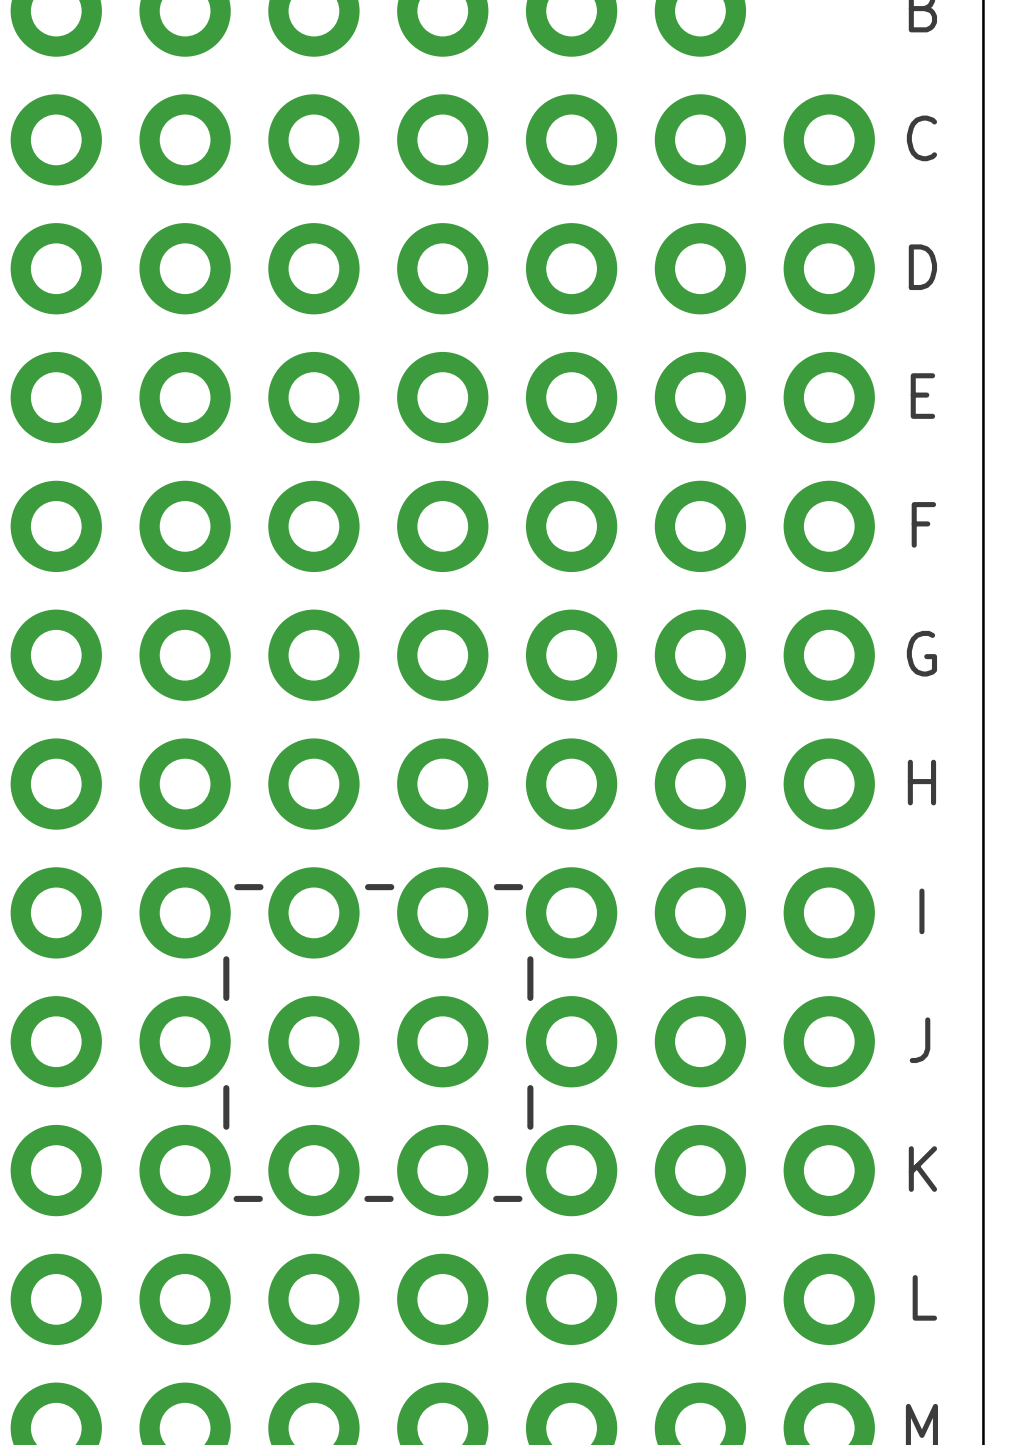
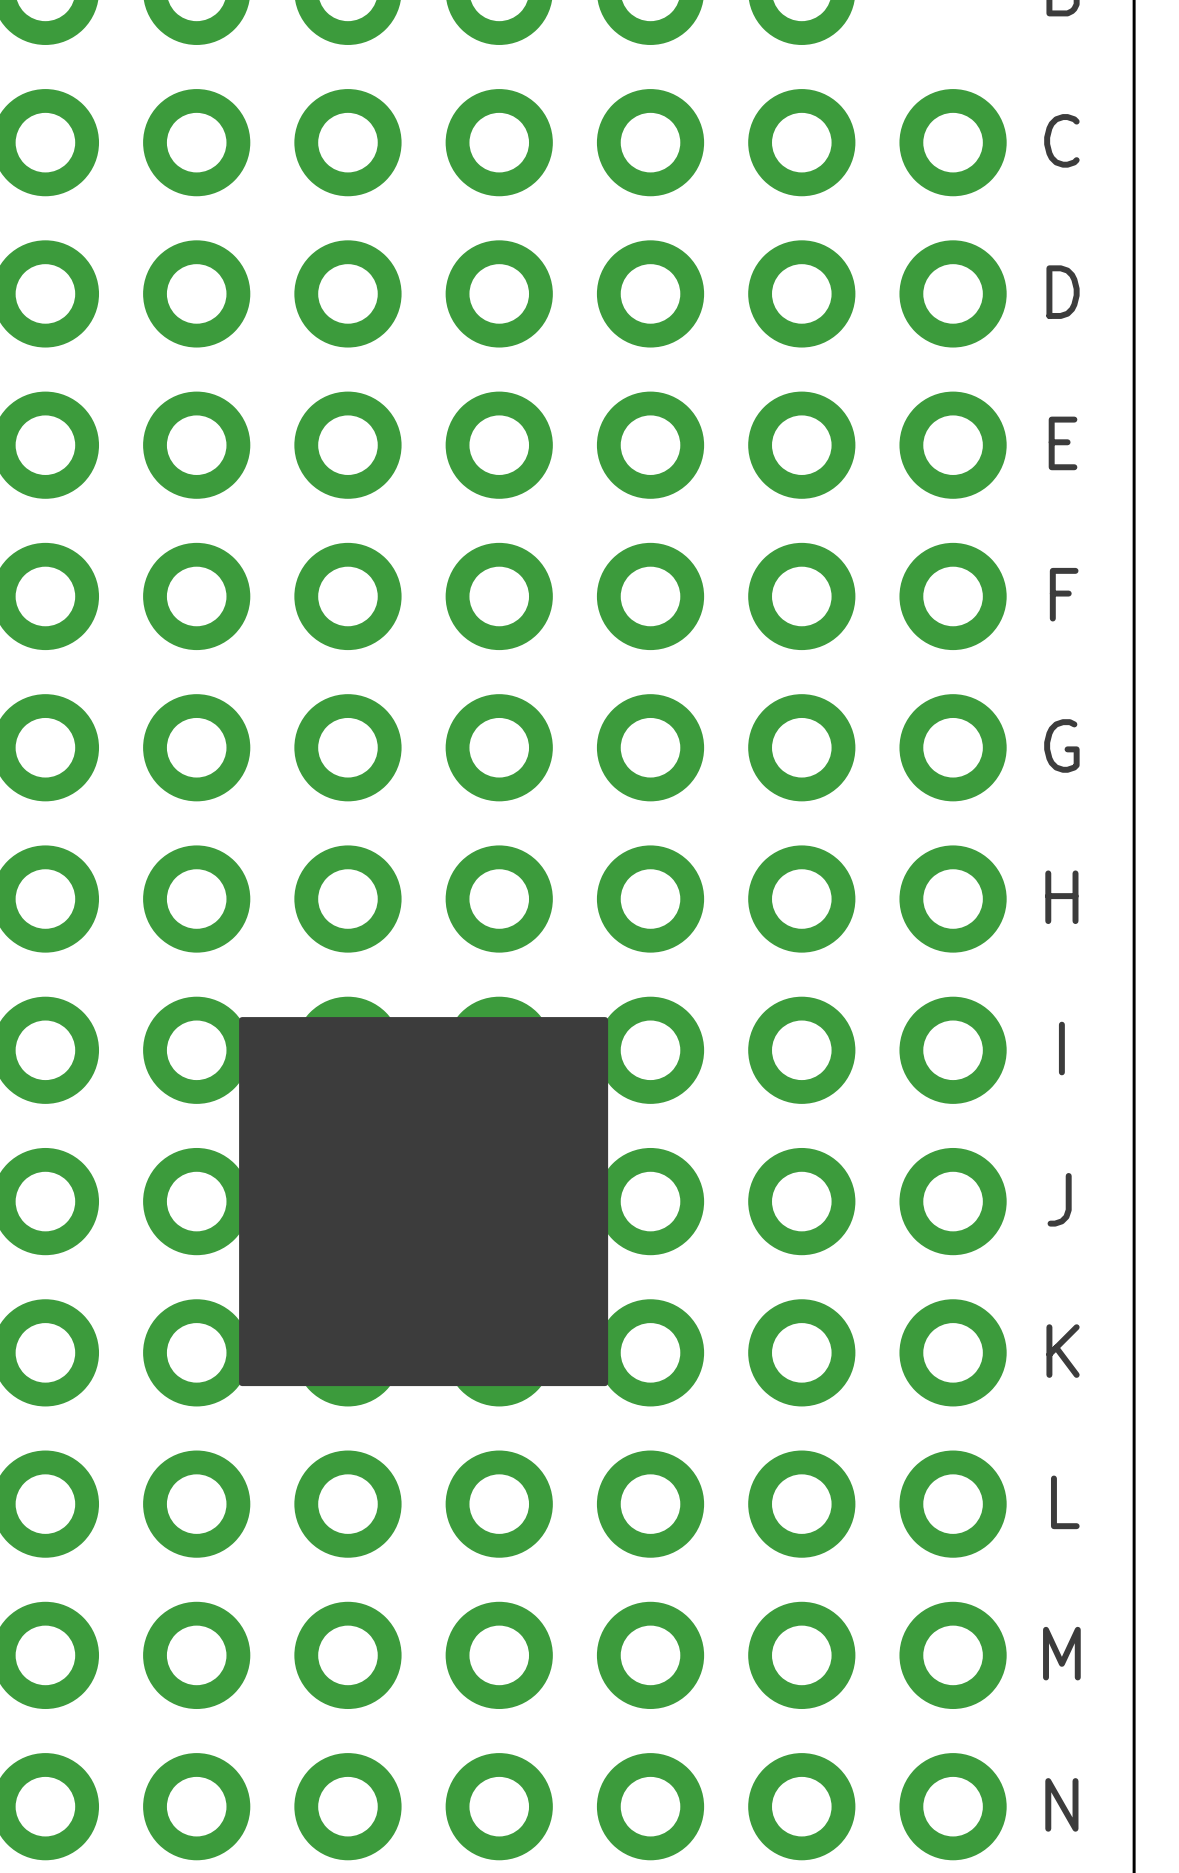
drawing: none -> [239, 1017, 609, 1387]
line: (237, 887) (260, 887) -> none
line: (368, 887) (391, 887) -> none
line: (496, 887) (520, 887) -> none
line: (226, 959) (226, 997) -> none
line: (530, 959) (530, 997) -> none
line: (226, 1088) (226, 1126) -> none
line: (530, 1088) (530, 1126) -> none
line: (236, 1198) (259, 1198) -> none
line: (367, 1198) (390, 1198) -> none
line: (496, 1198) (519, 1198) -> none

